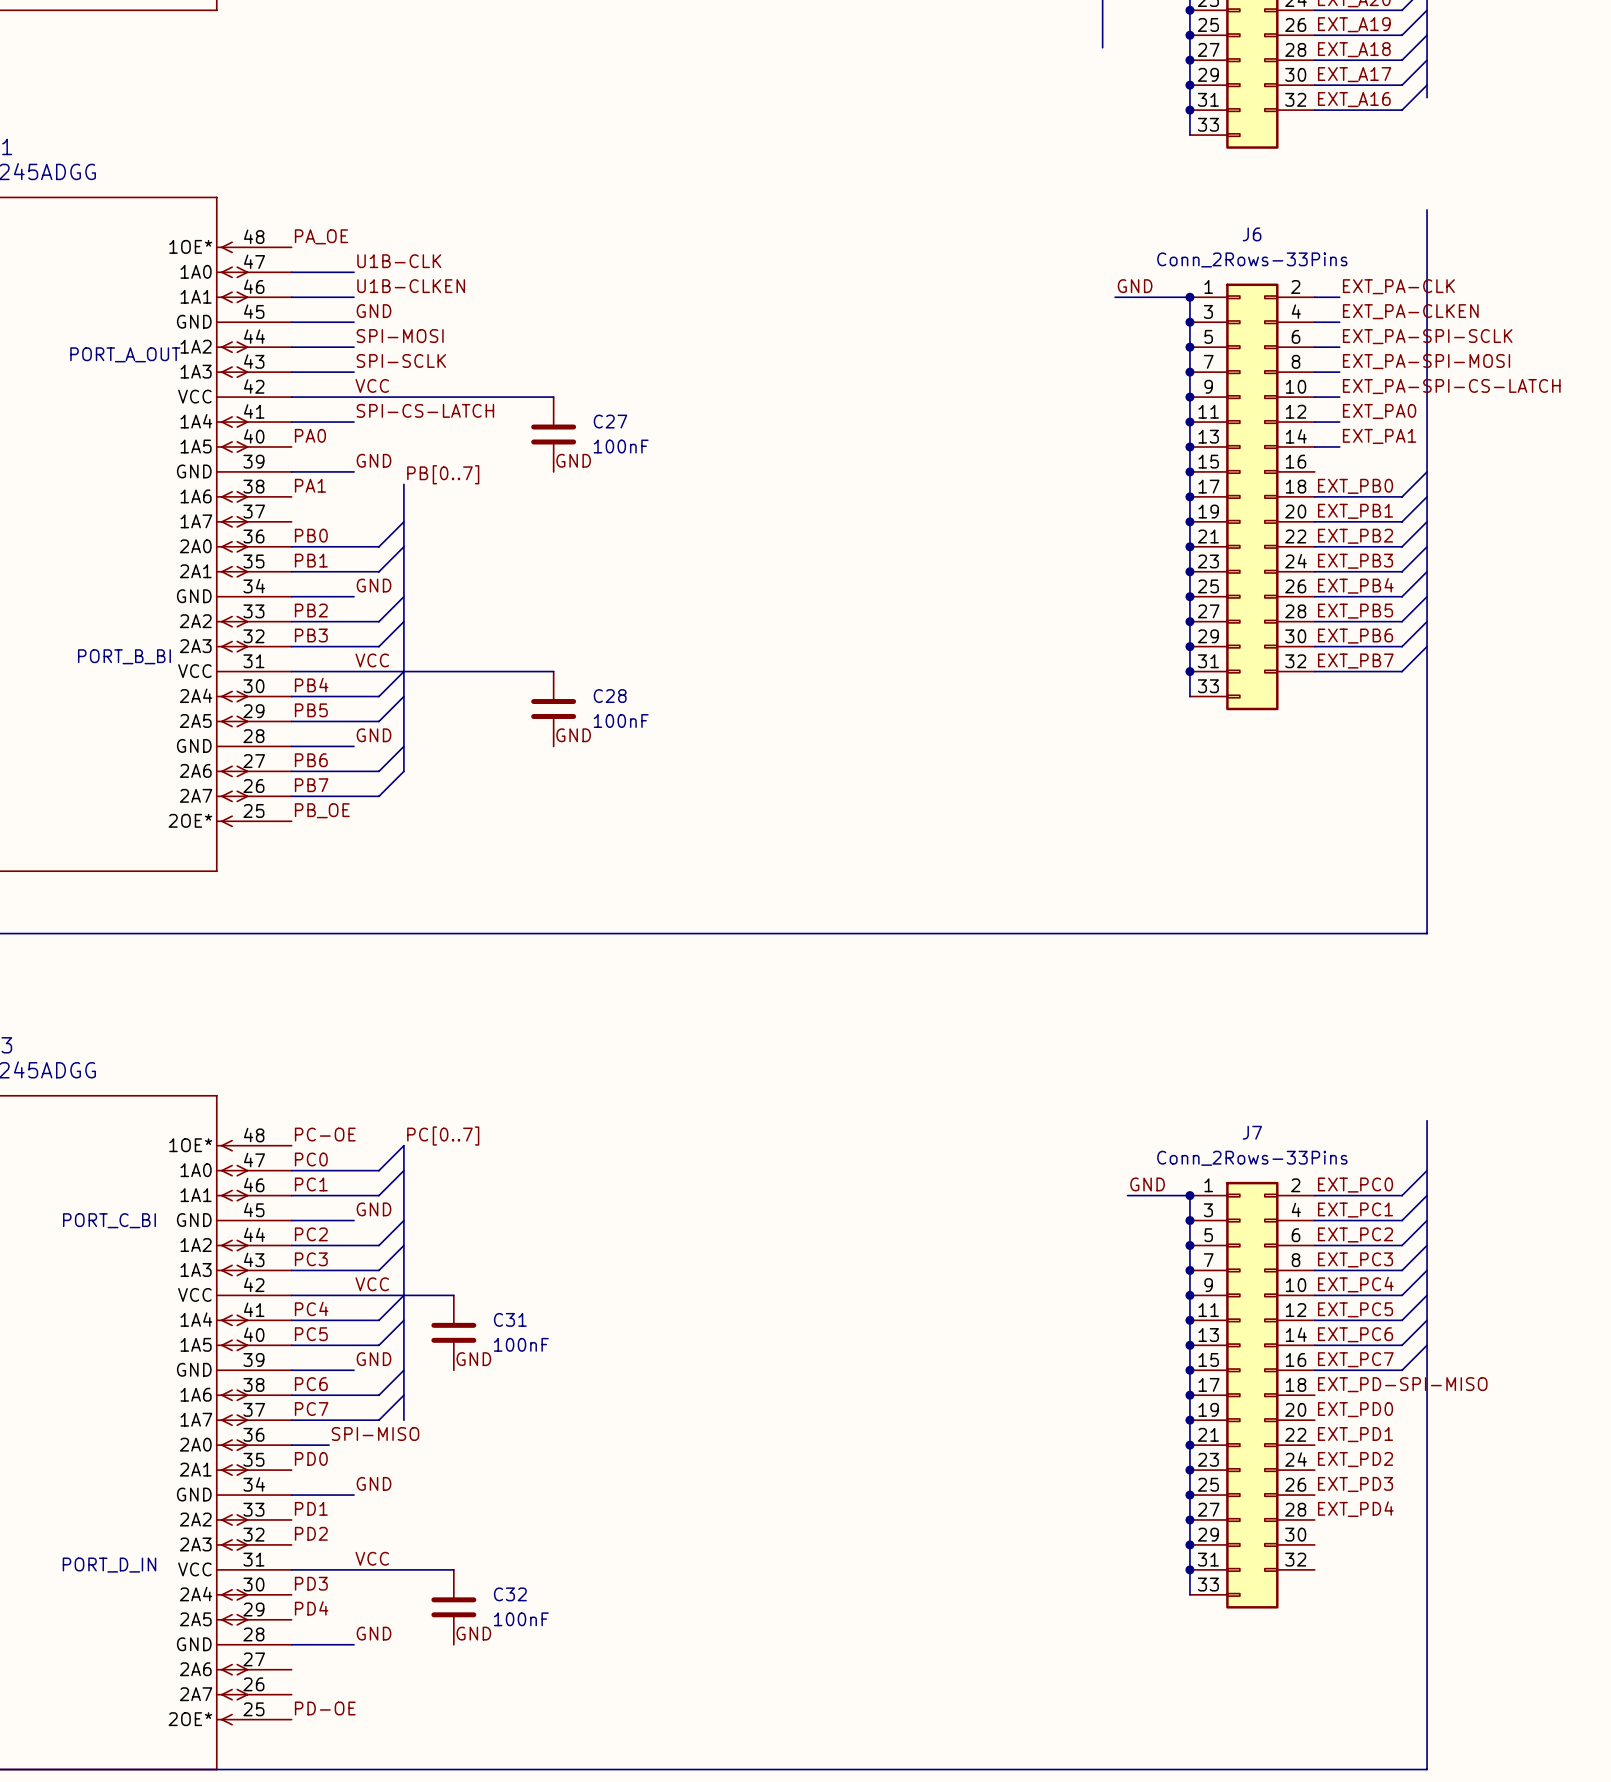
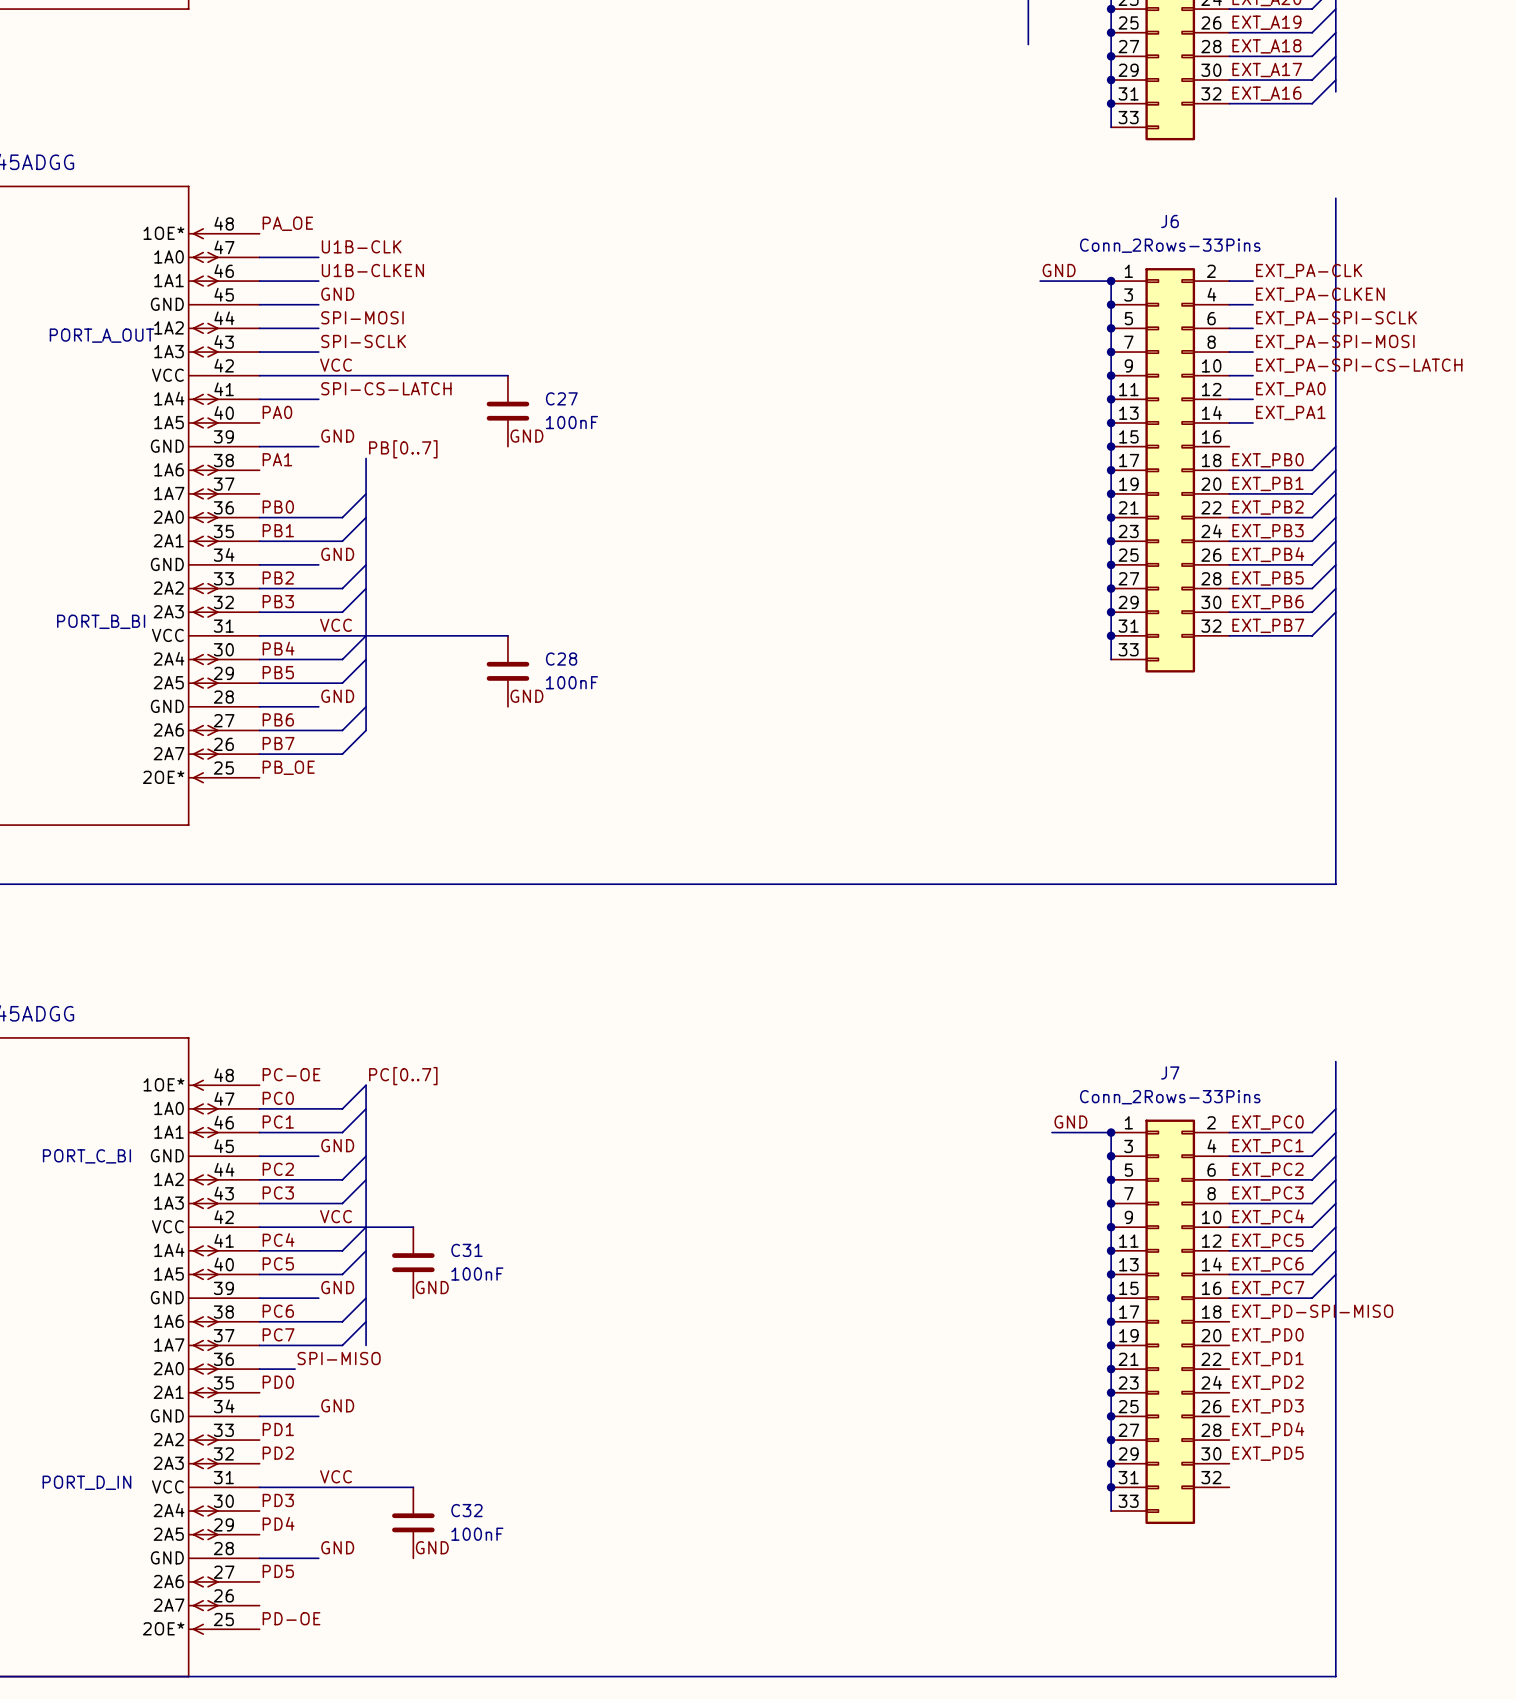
label: none -> EXT_PD5 (1268, 1453)
label: none -> PD5 (278, 1571)

